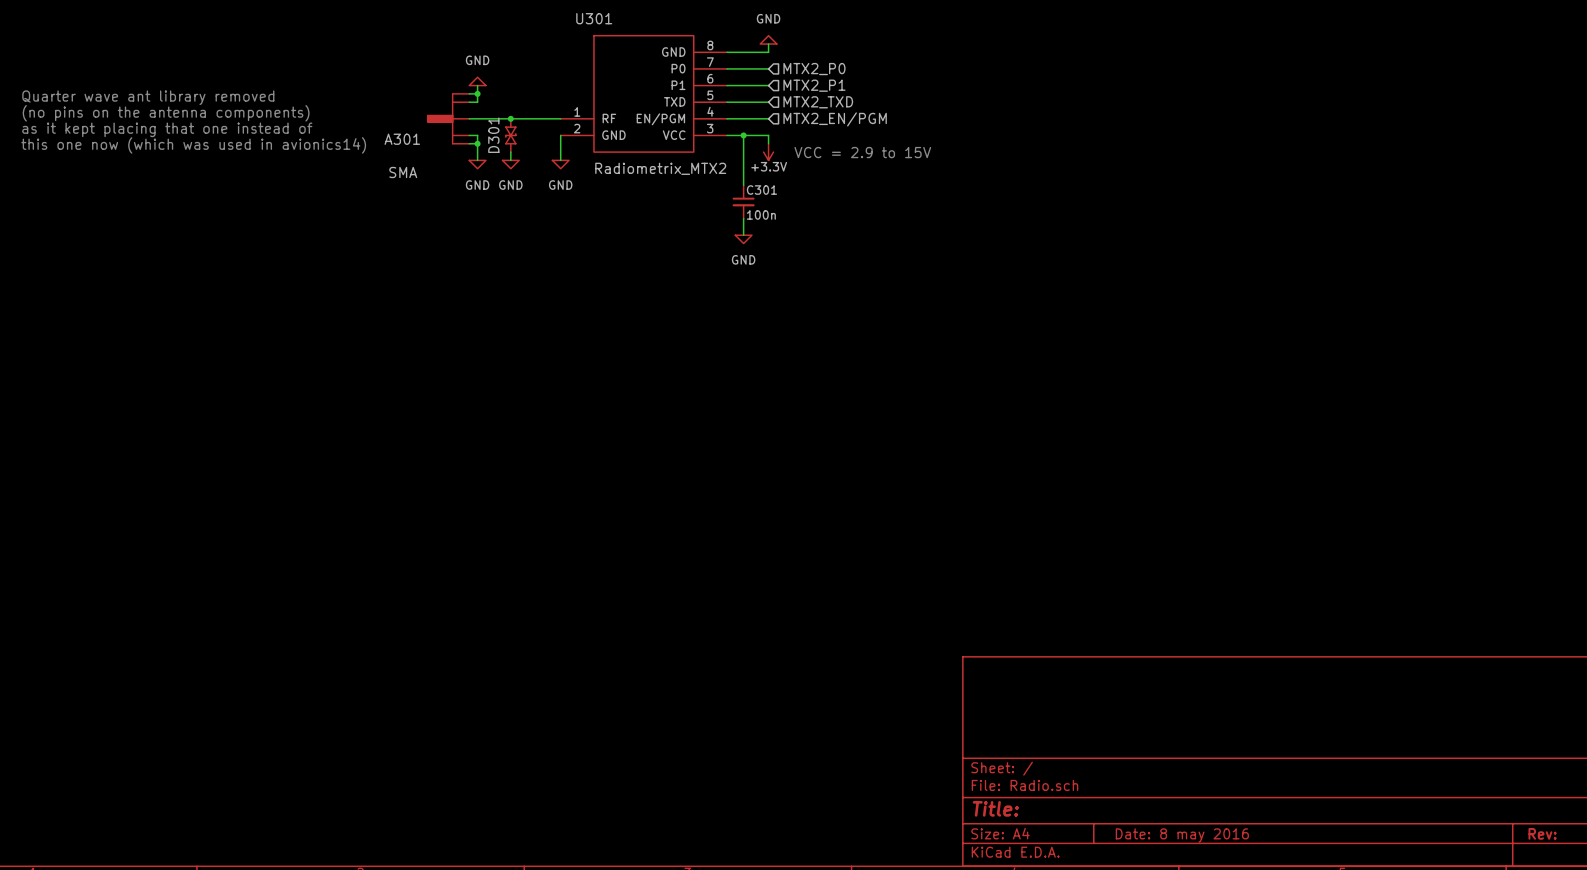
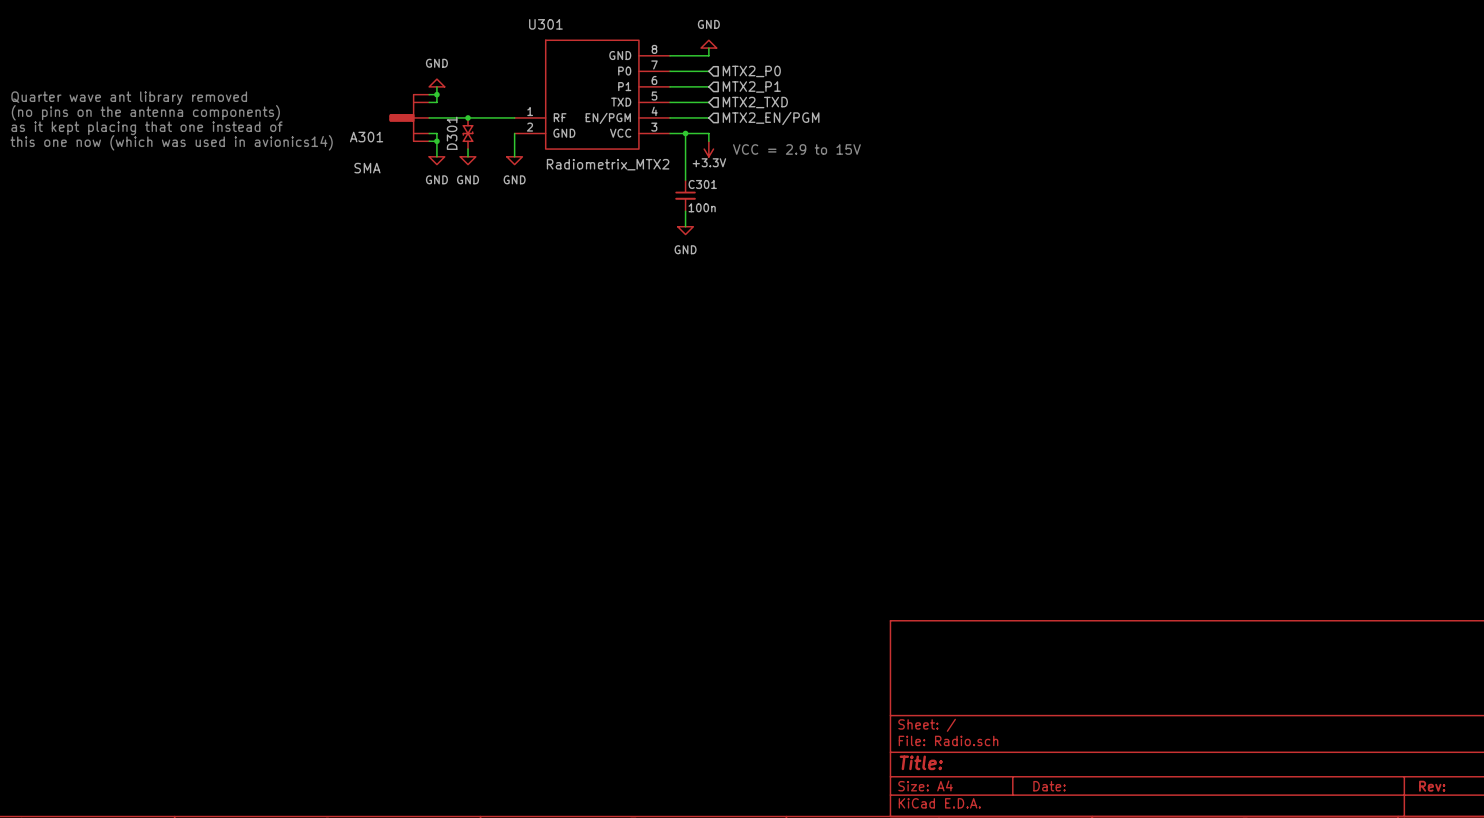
title block: Date: 8 may 2016 (1182, 835) -> Date: (1049, 786)

